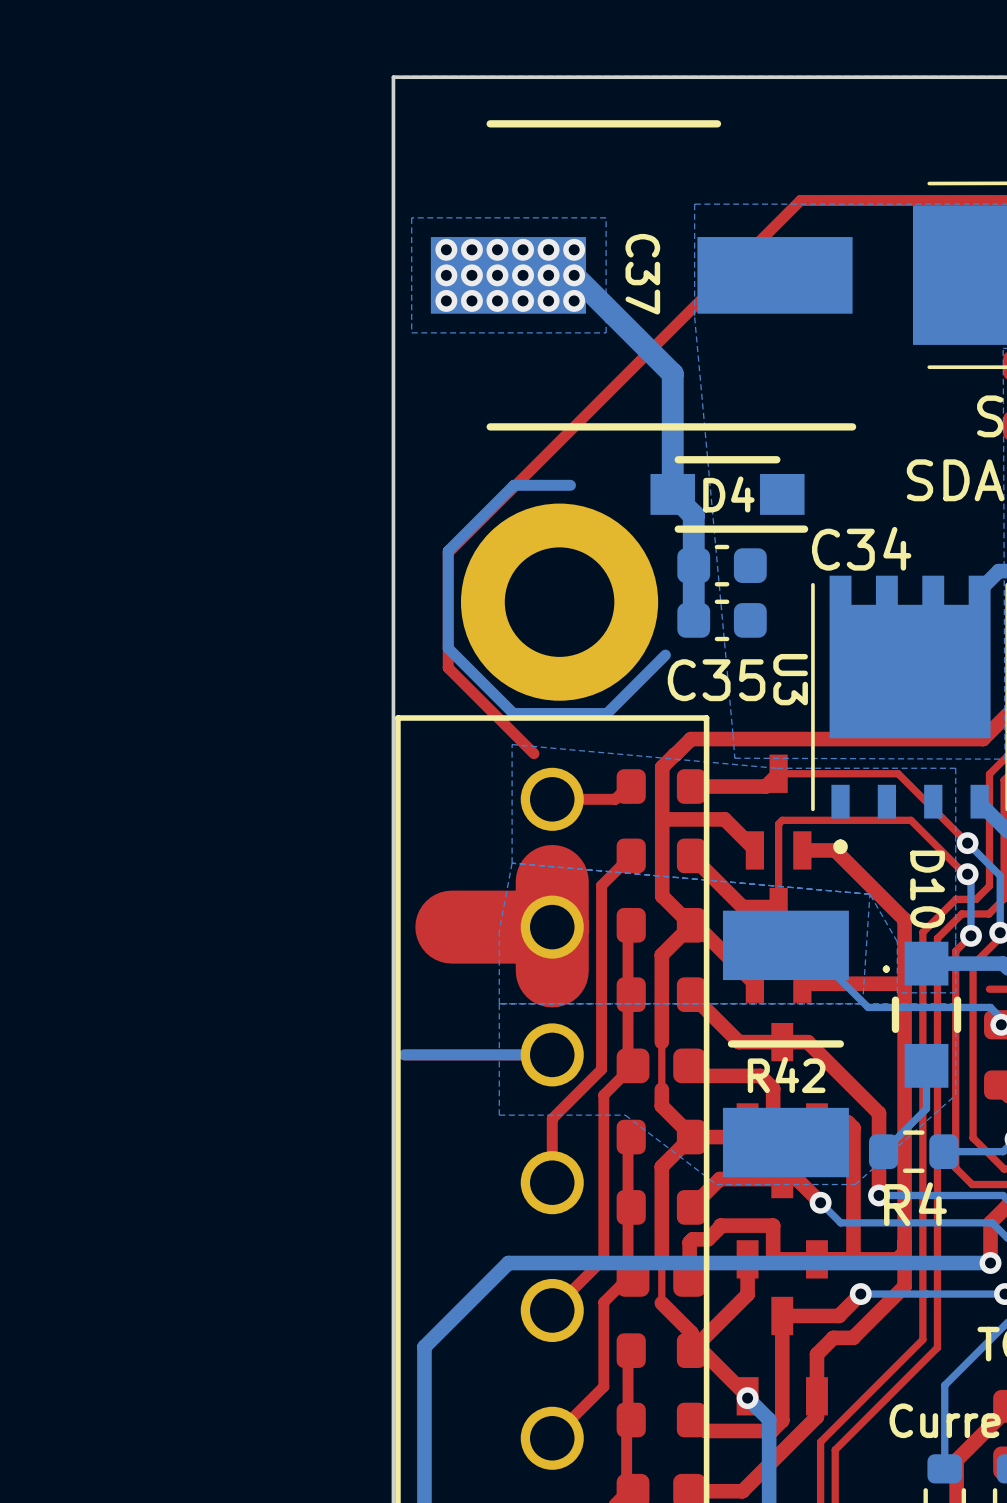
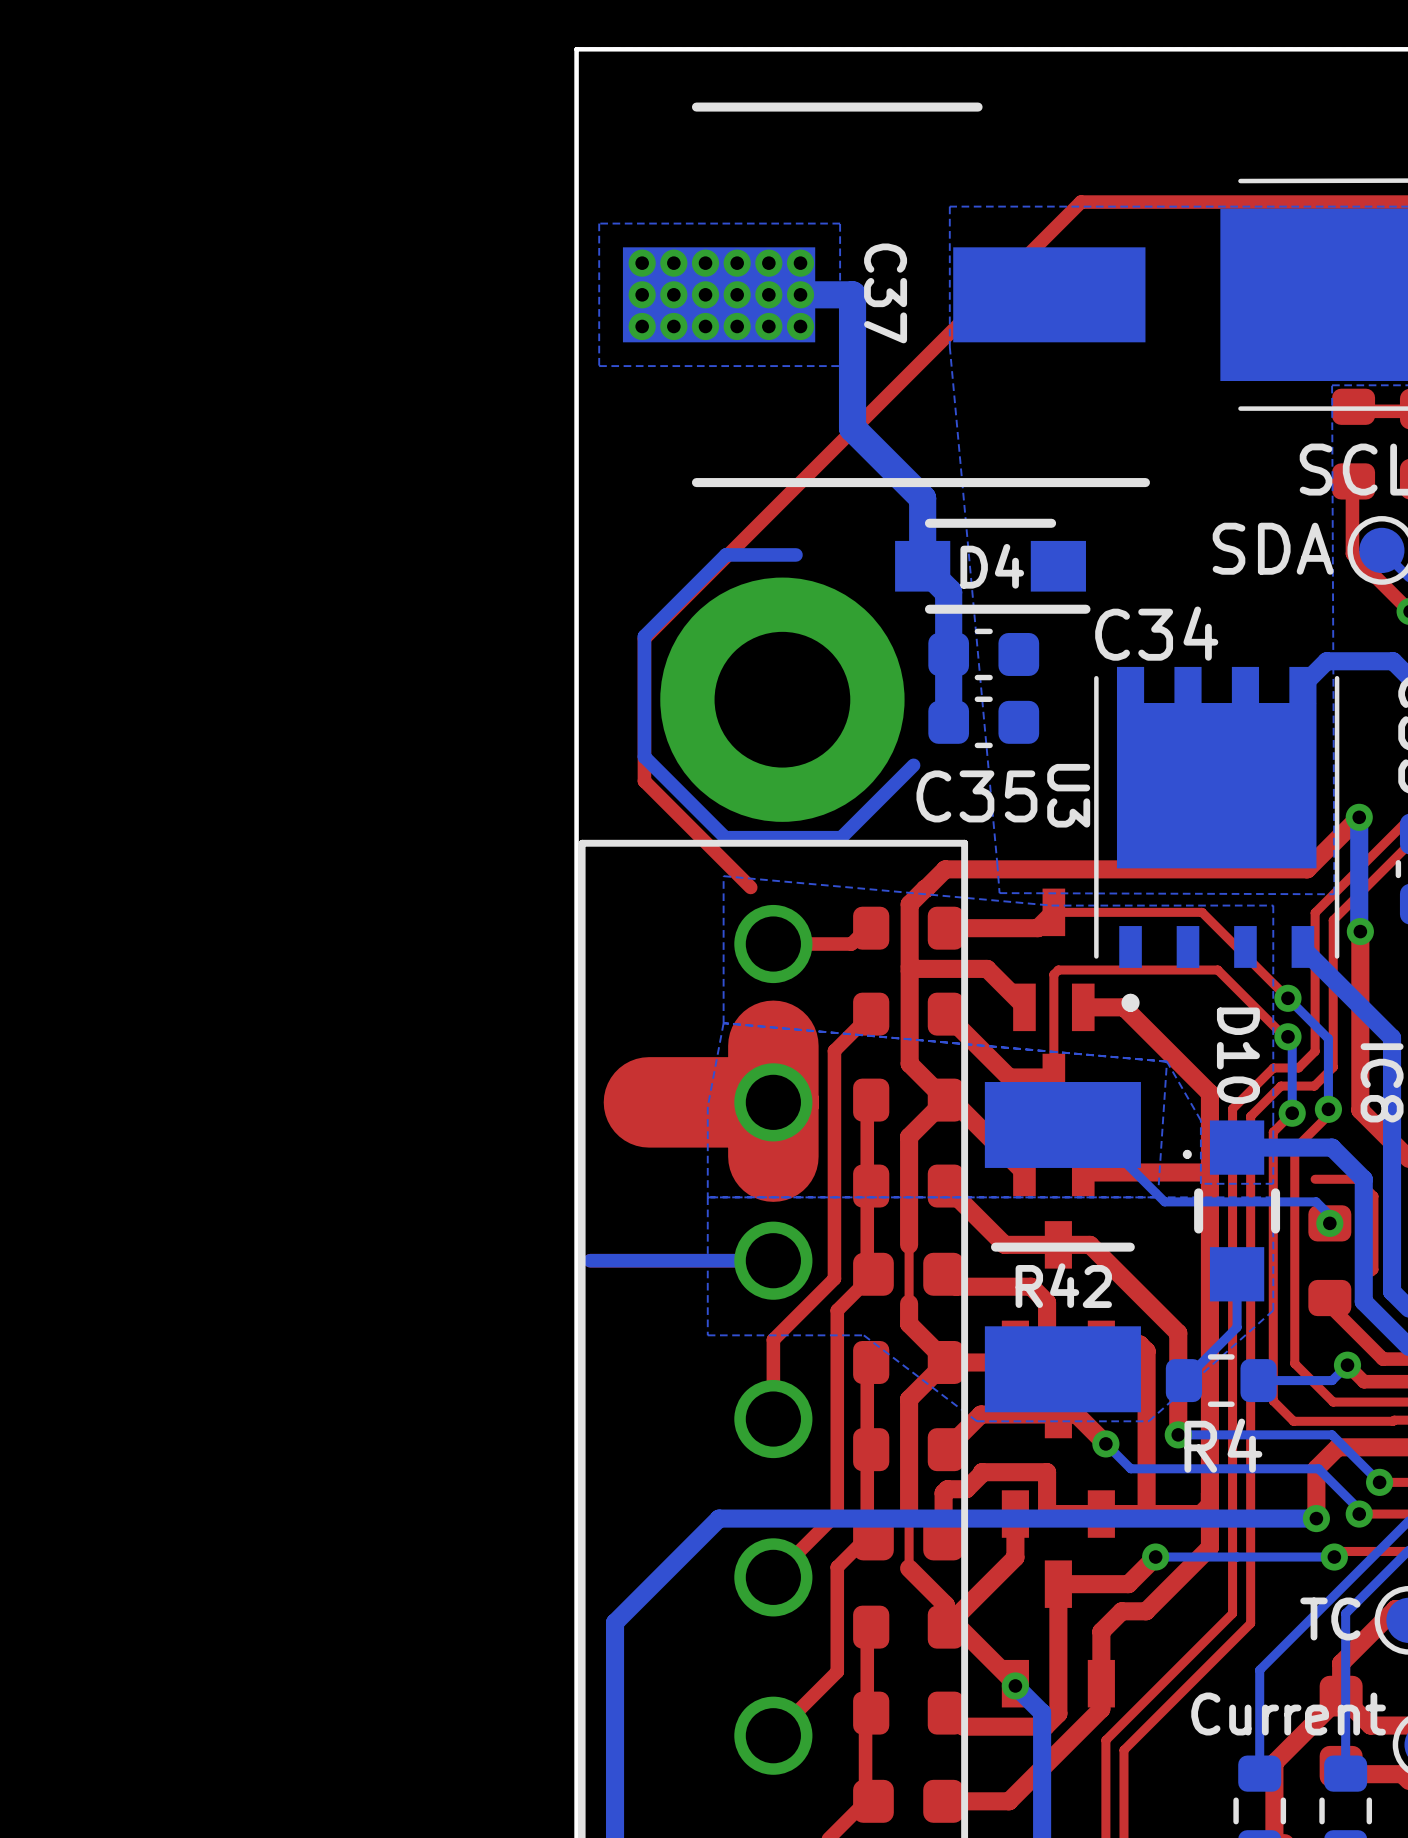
bottom track: (574, 275) (672, 373) (672, 439) -> (800, 294) (852, 294) (852, 428) (922, 498)

